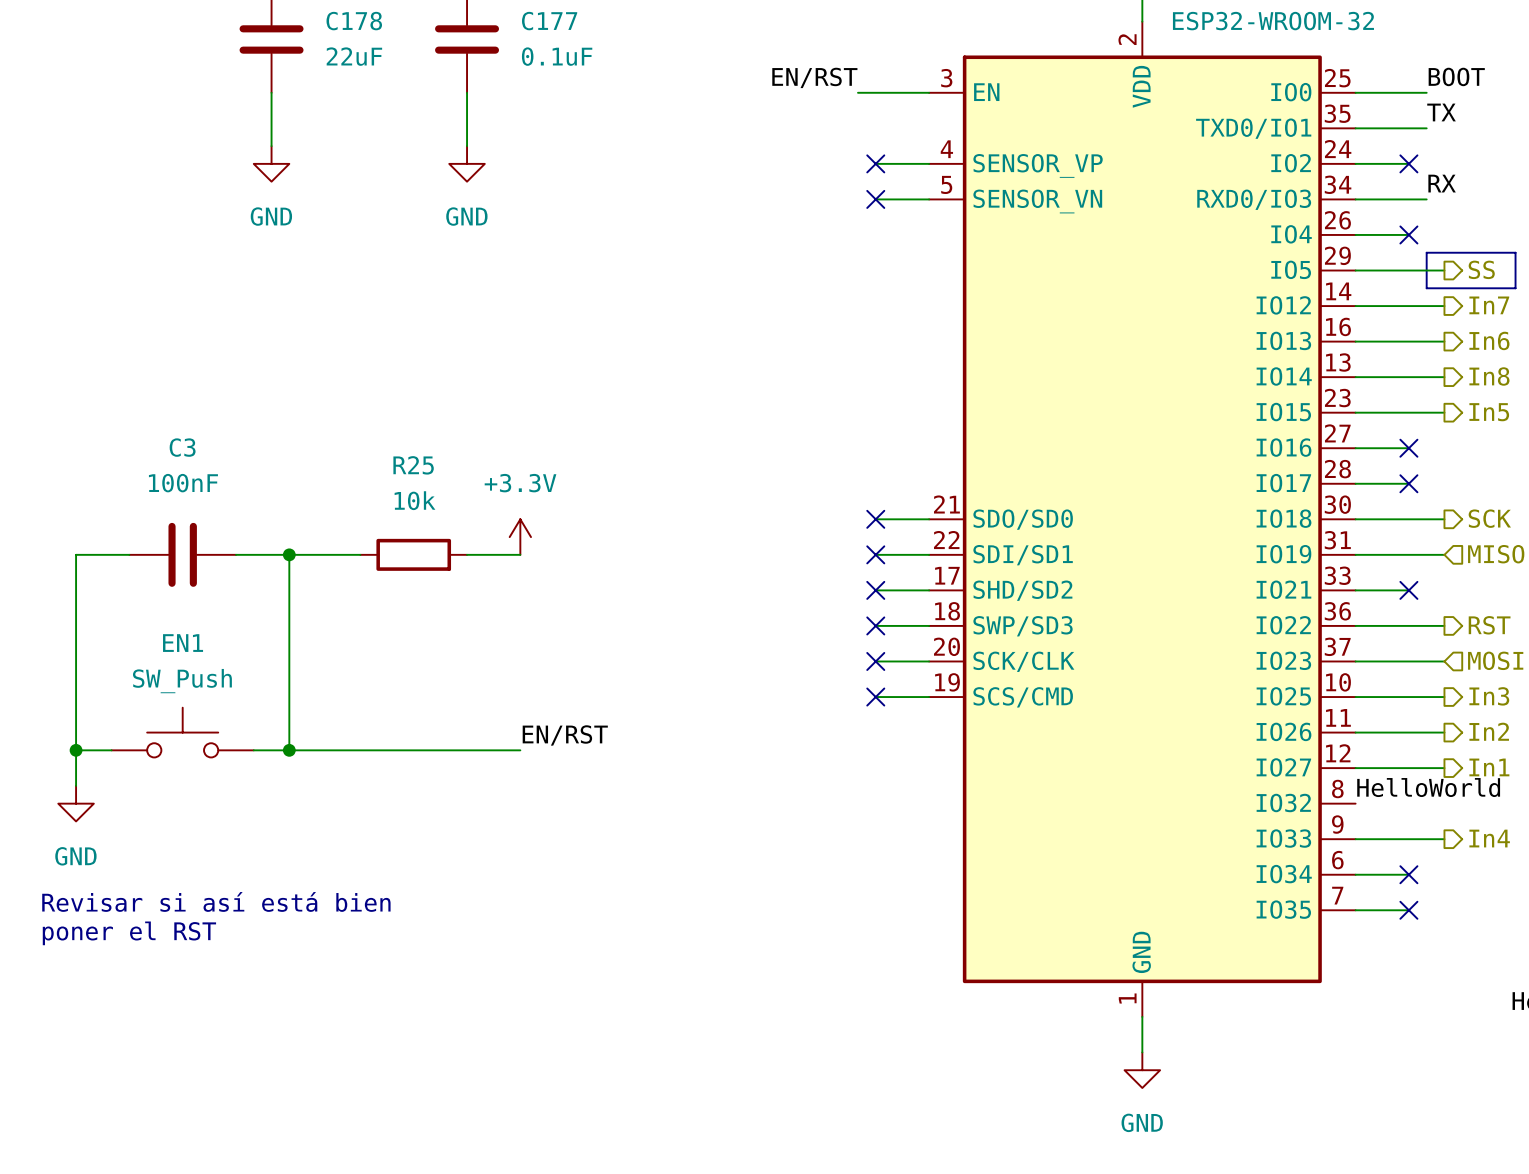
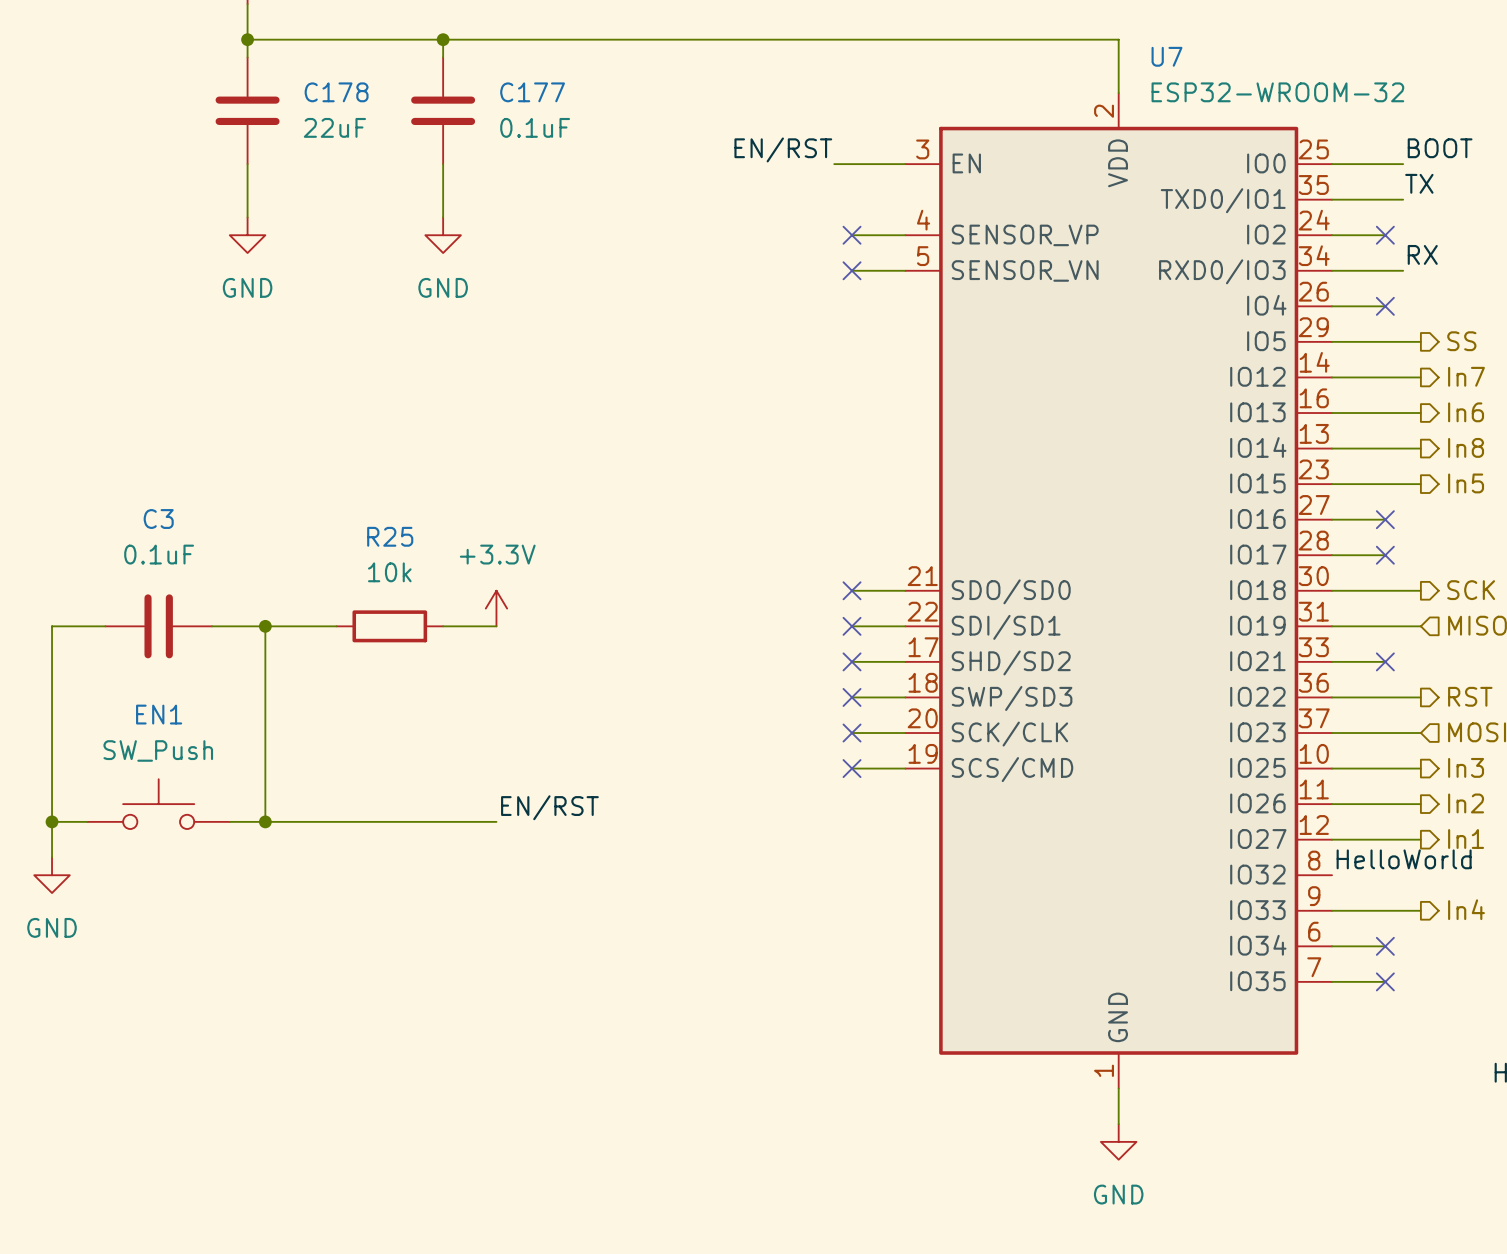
line: (1426, 252) (1426, 288) (1515, 288) (1515, 252) (1426, 252) -> none
C3 value: 100nF (183, 483) -> 0.1uF (159, 554)
text: Revisar si así está bien (216, 901) -> none
text: poner el RST (129, 933) -> none

